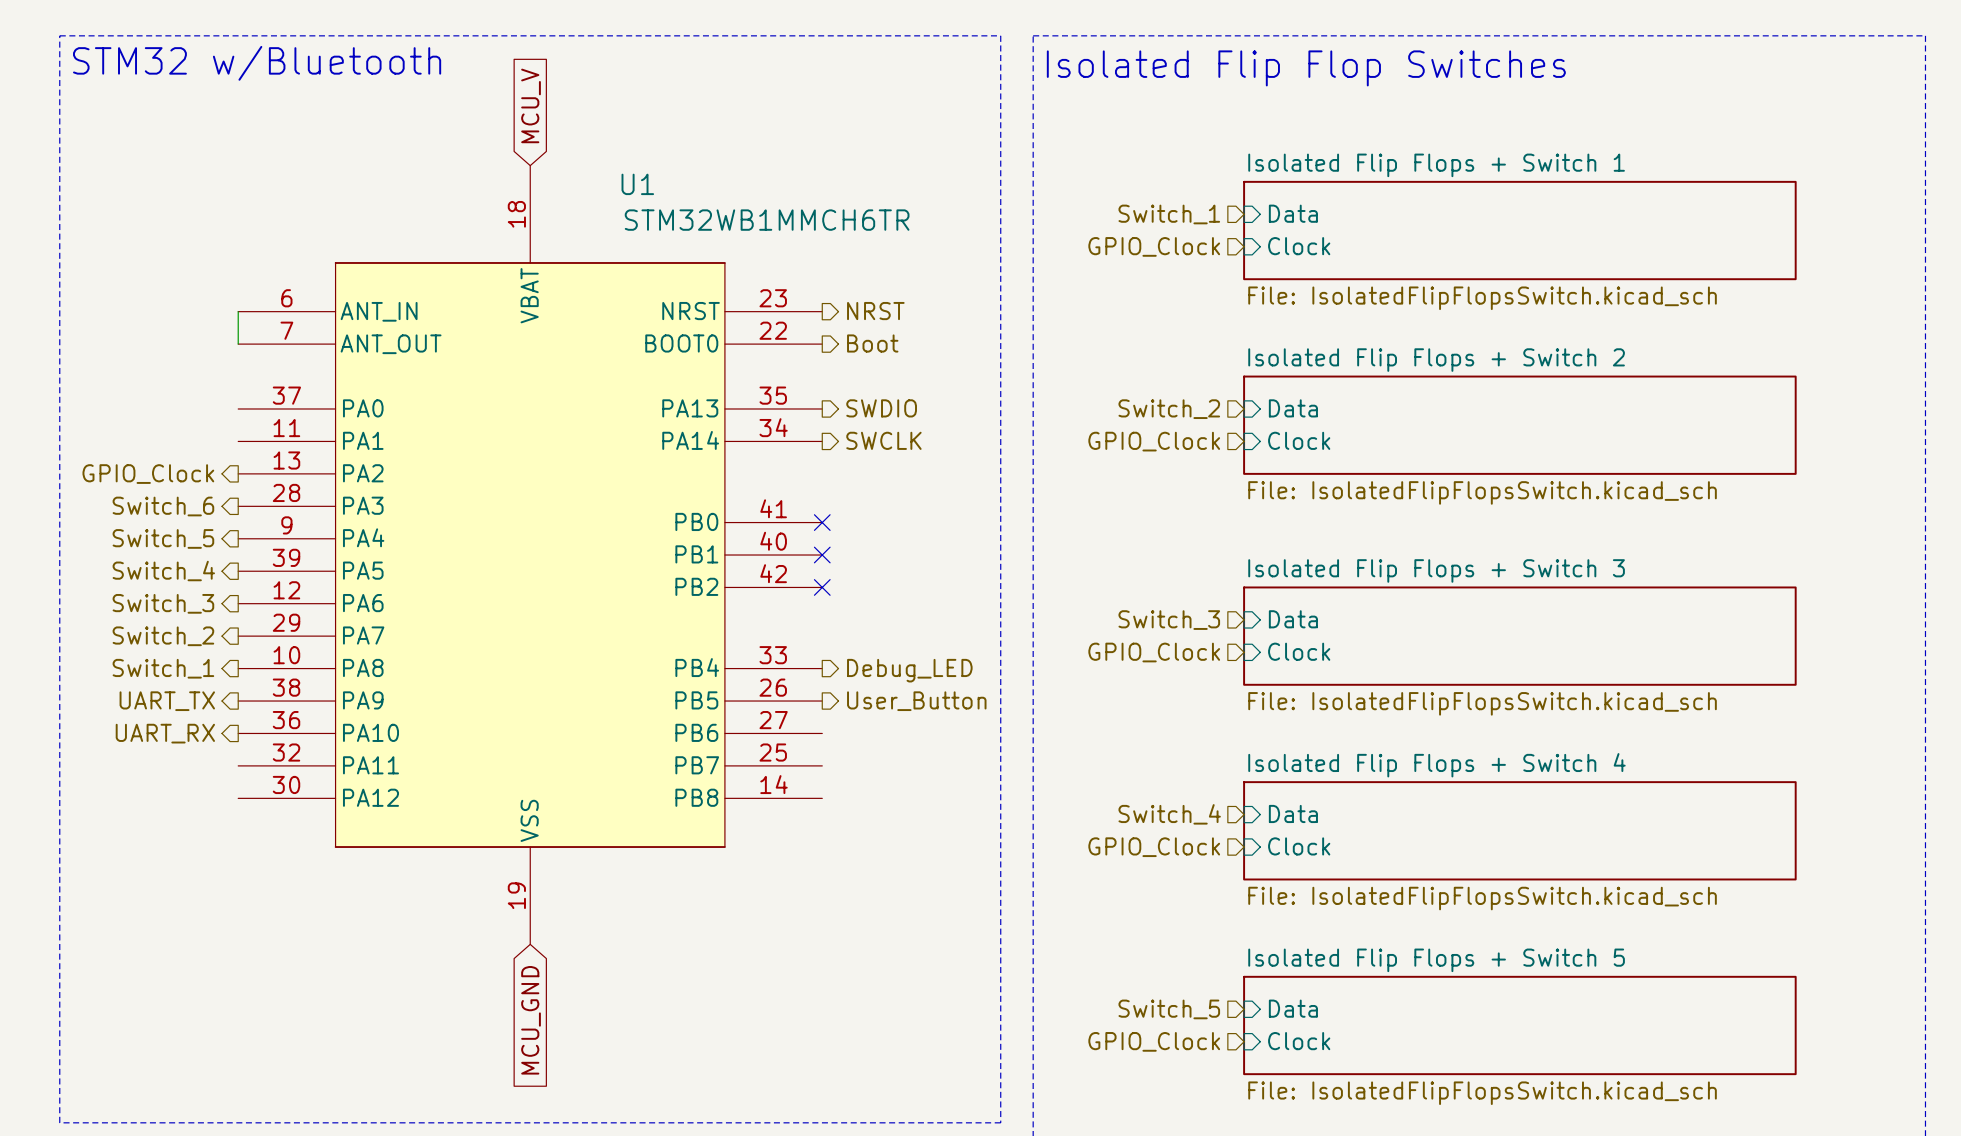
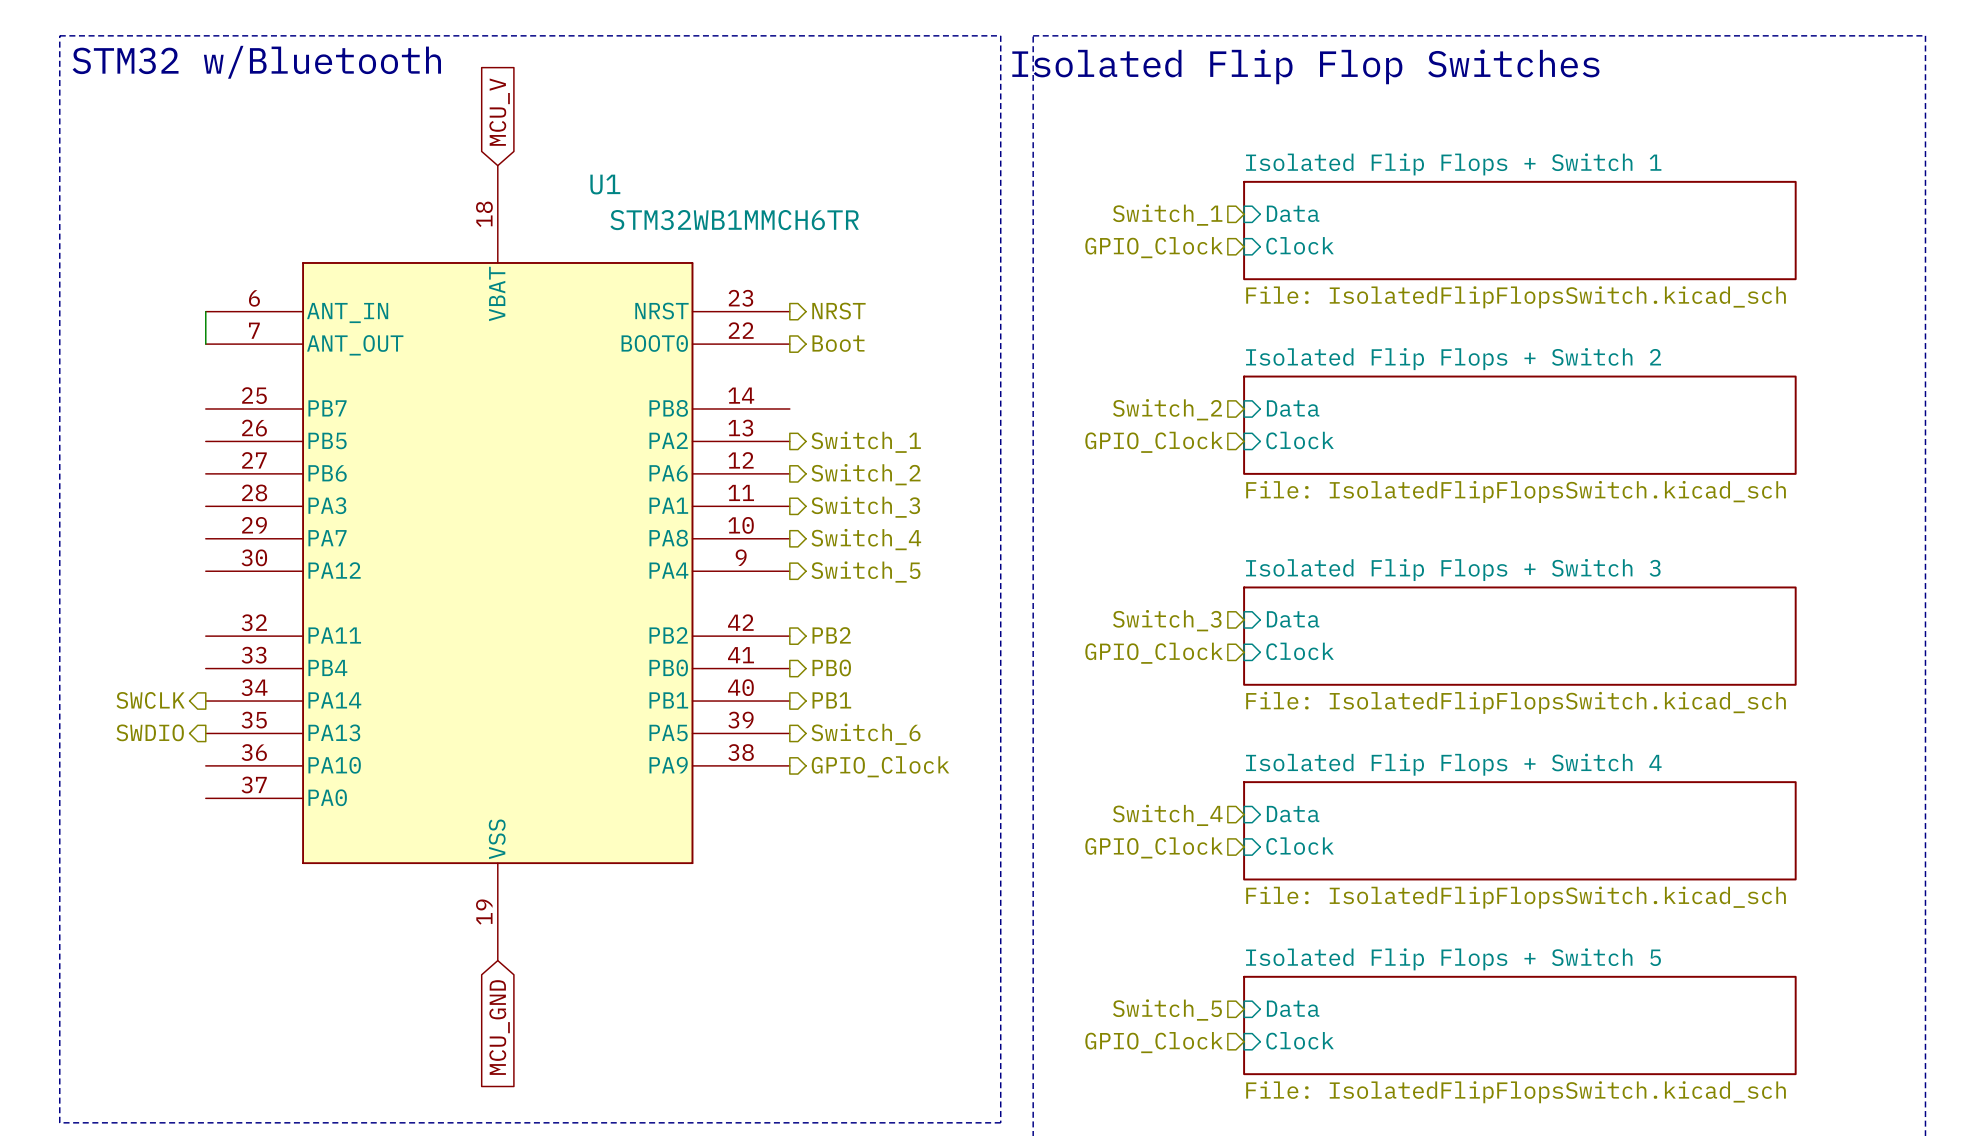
global label position: MCU_V (531, 105) -> MCU_V (499, 112)
U1 symbol: [238, 165, 823, 945] -> [205, 165, 790, 961]
wire: (238, 311) (238, 344) -> (205, 311) (205, 344)
hierarchical label position: NRST (875, 311) -> NRST (838, 311)
hierarchical label position: Boot (872, 343) -> Boot (838, 343)
hierarchical label: SWDIO (881, 408) -> none
hierarchical label: SWCLK (883, 440) -> none
hierarchical label: none -> Switch_1 (866, 442)
hierarchical label: GPIO_Clock (148, 474) -> none
hierarchical label: none -> Switch_2 (866, 474)
hierarchical label: Switch_6 (163, 506) -> none
hierarchical label: none -> Switch_3 (865, 507)
no-connect mark: (822, 522) -> none
hierarchical label: Switch_5 (163, 538) -> none
hierarchical label: none -> Switch_4 (866, 539)
no-connect mark: (822, 555) -> none
hierarchical label: Switch_4 (163, 571) -> none
hierarchical label: none -> Switch_5 (865, 572)
no-connect mark: (822, 587) -> none
hierarchical label: Switch_3 (163, 603) -> none
hierarchical label: none -> PB2 (831, 635)
hierarchical label: Switch_2 (163, 636) -> none
hierarchical label: none -> PB0 (831, 667)
hierarchical label: Switch_1 (163, 668) -> none
hierarchical label: Debug_LED (909, 670) -> none
hierarchical label: none -> SWCLK (150, 700)
hierarchical label: none -> PB1 (831, 700)
hierarchical label: UART_TX (167, 701) -> none
hierarchical label: User_Button (916, 701) -> none
hierarchical label: none -> SWDIO (150, 732)
hierarchical label: UART_RX (165, 733) -> none
hierarchical label: none -> Switch_6 (865, 734)
hierarchical label: none -> GPIO_Clock (880, 766)
global label position: MCU_GND (531, 1020) -> MCU_GND (499, 1027)

